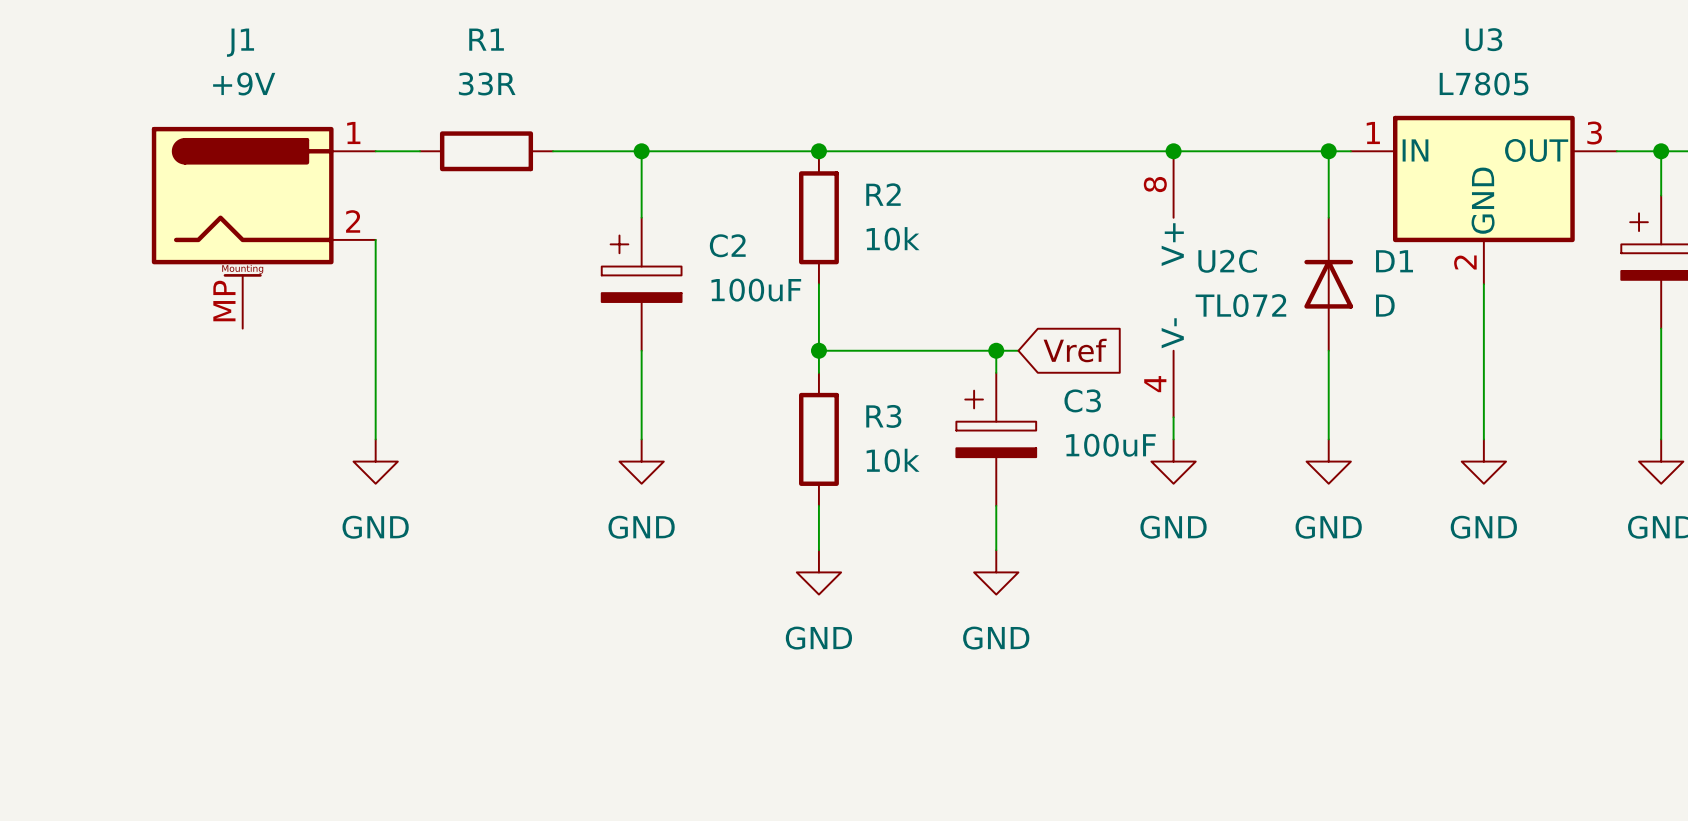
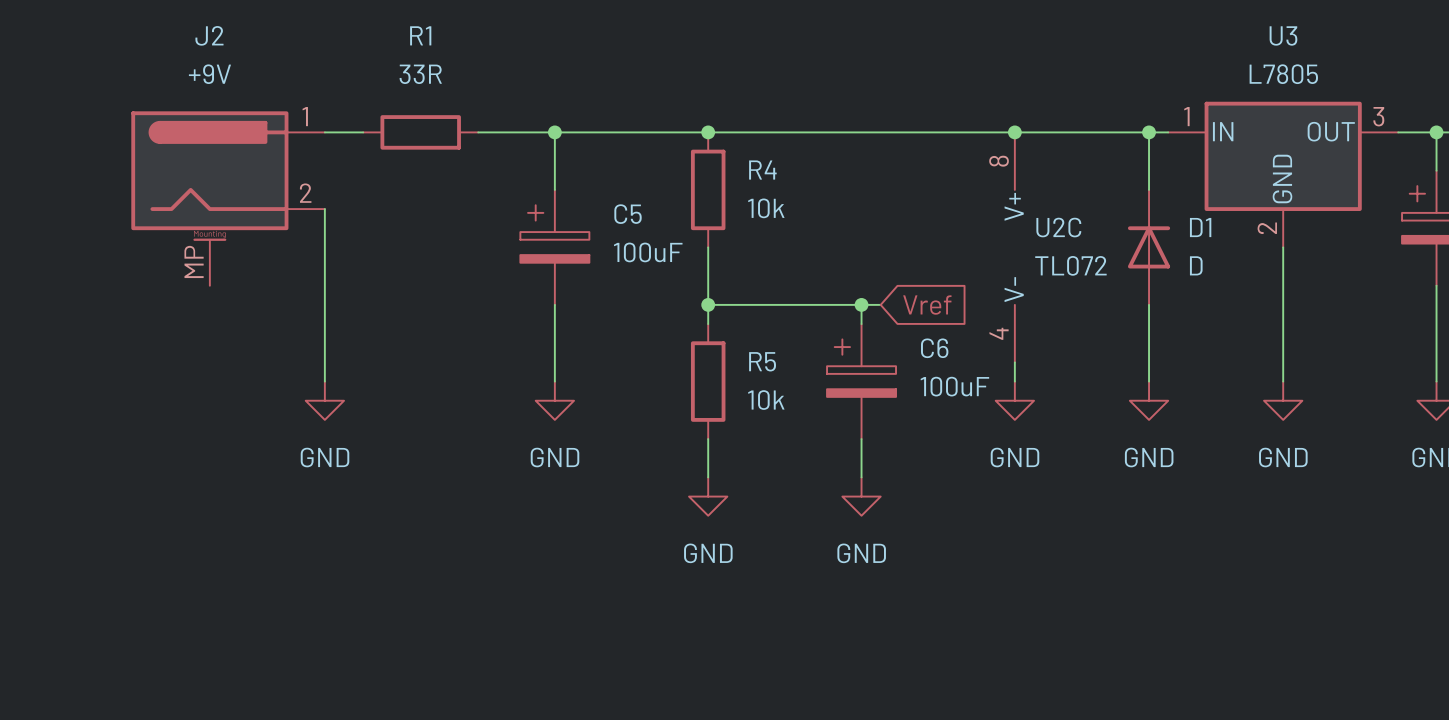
J1 name: J1 (240, 42) -> J2 (209, 35)
R2 name: R2 (883, 194) -> R4 (762, 170)
C2 name: C2 (727, 245) -> C5 (628, 214)
C3 name: C3 (1082, 400) -> C6 (934, 348)
R3 name: R3 (883, 416) -> R5 (762, 361)

